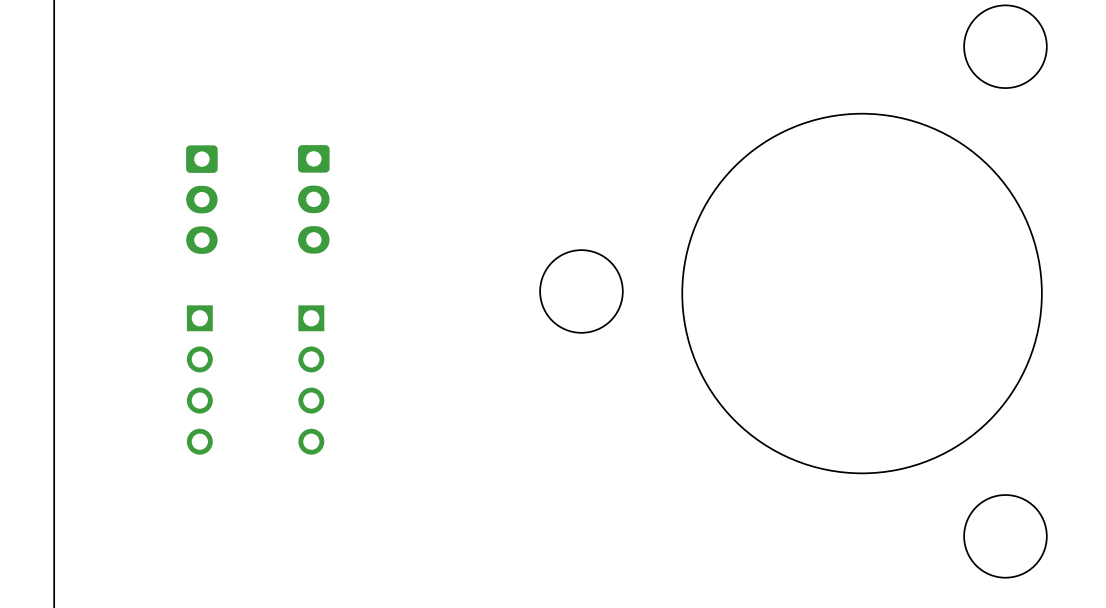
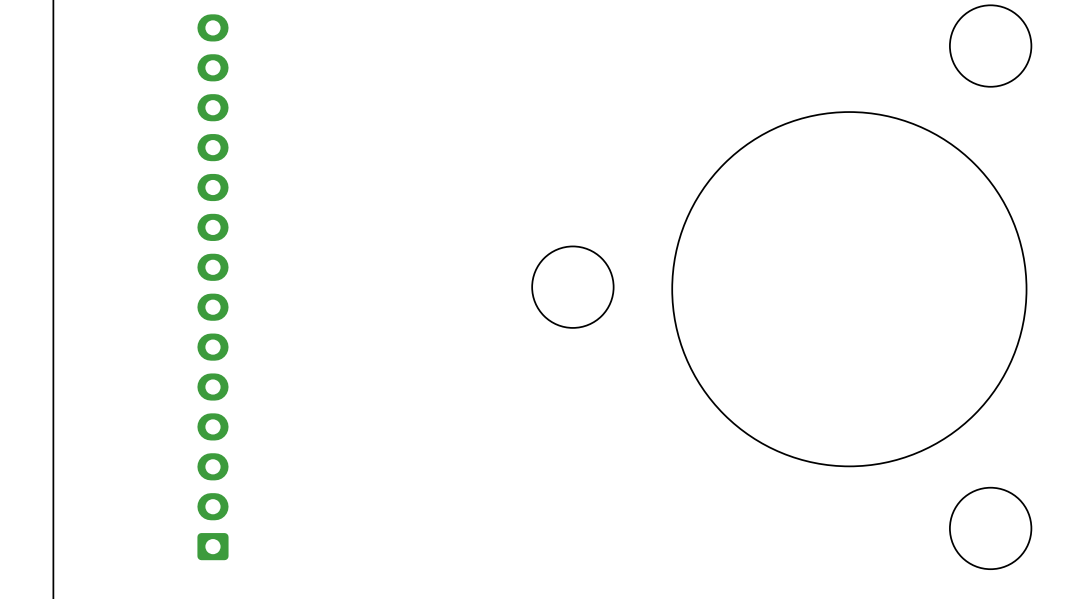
part: (201, 199) -> none
part: (313, 199) -> none
part: none -> (212, 287)
part: (199, 380) -> none
part: (311, 380) -> none

